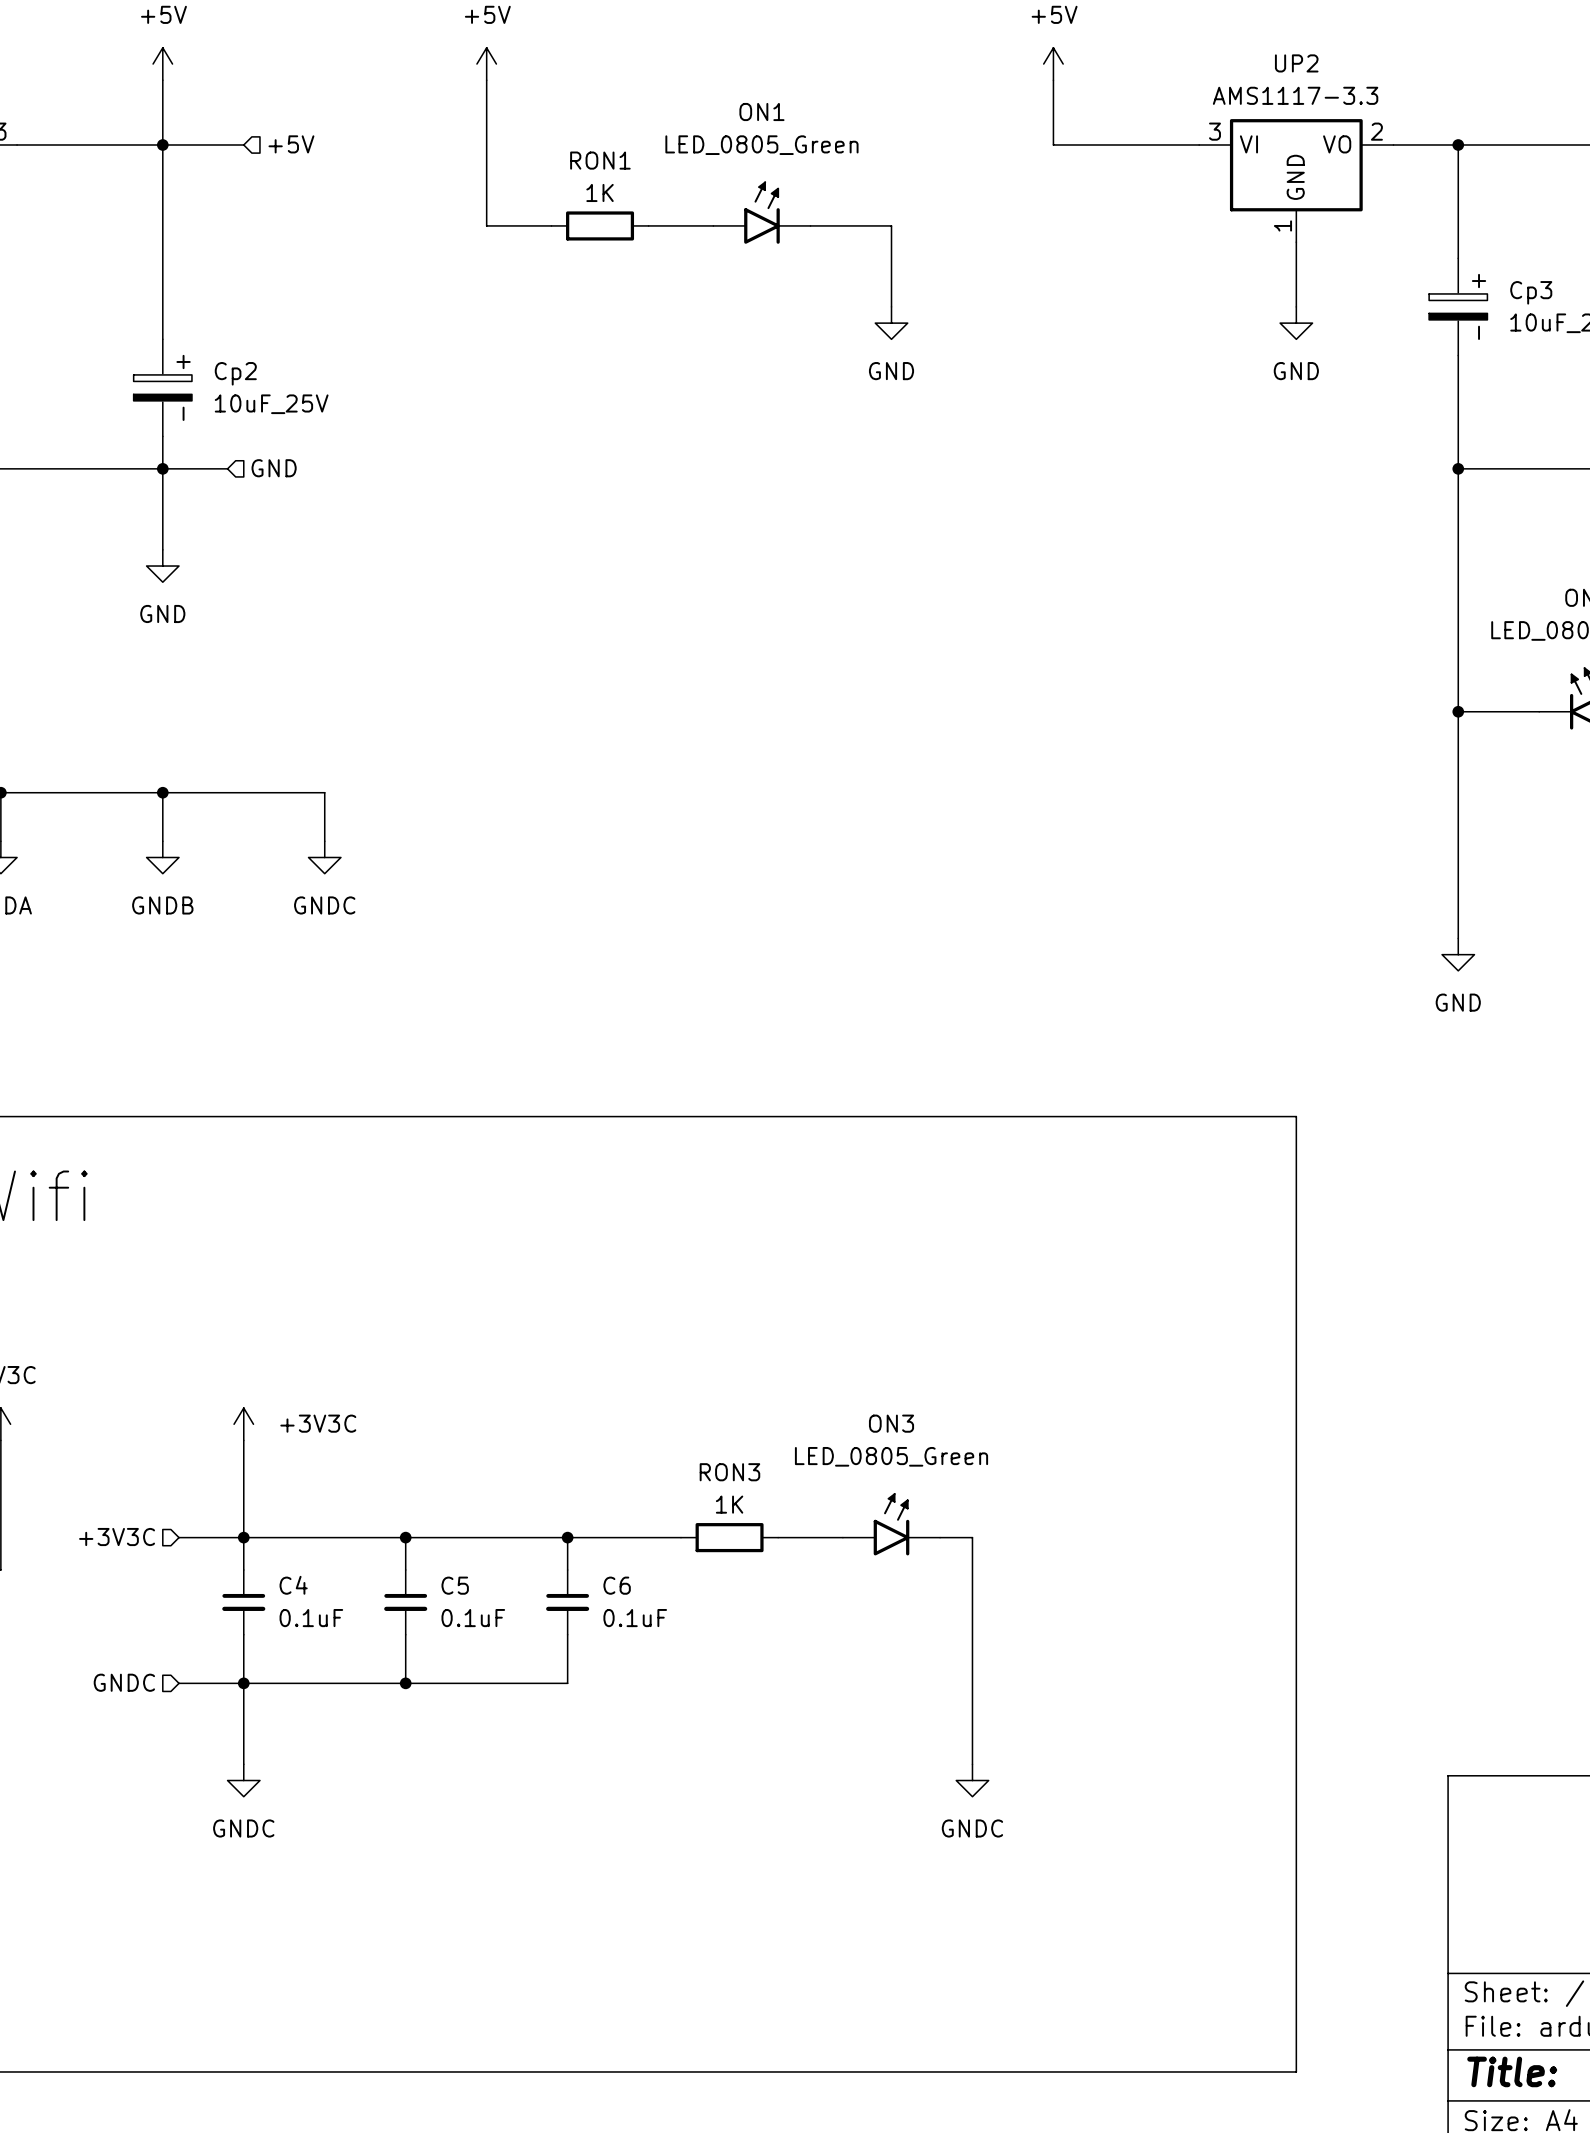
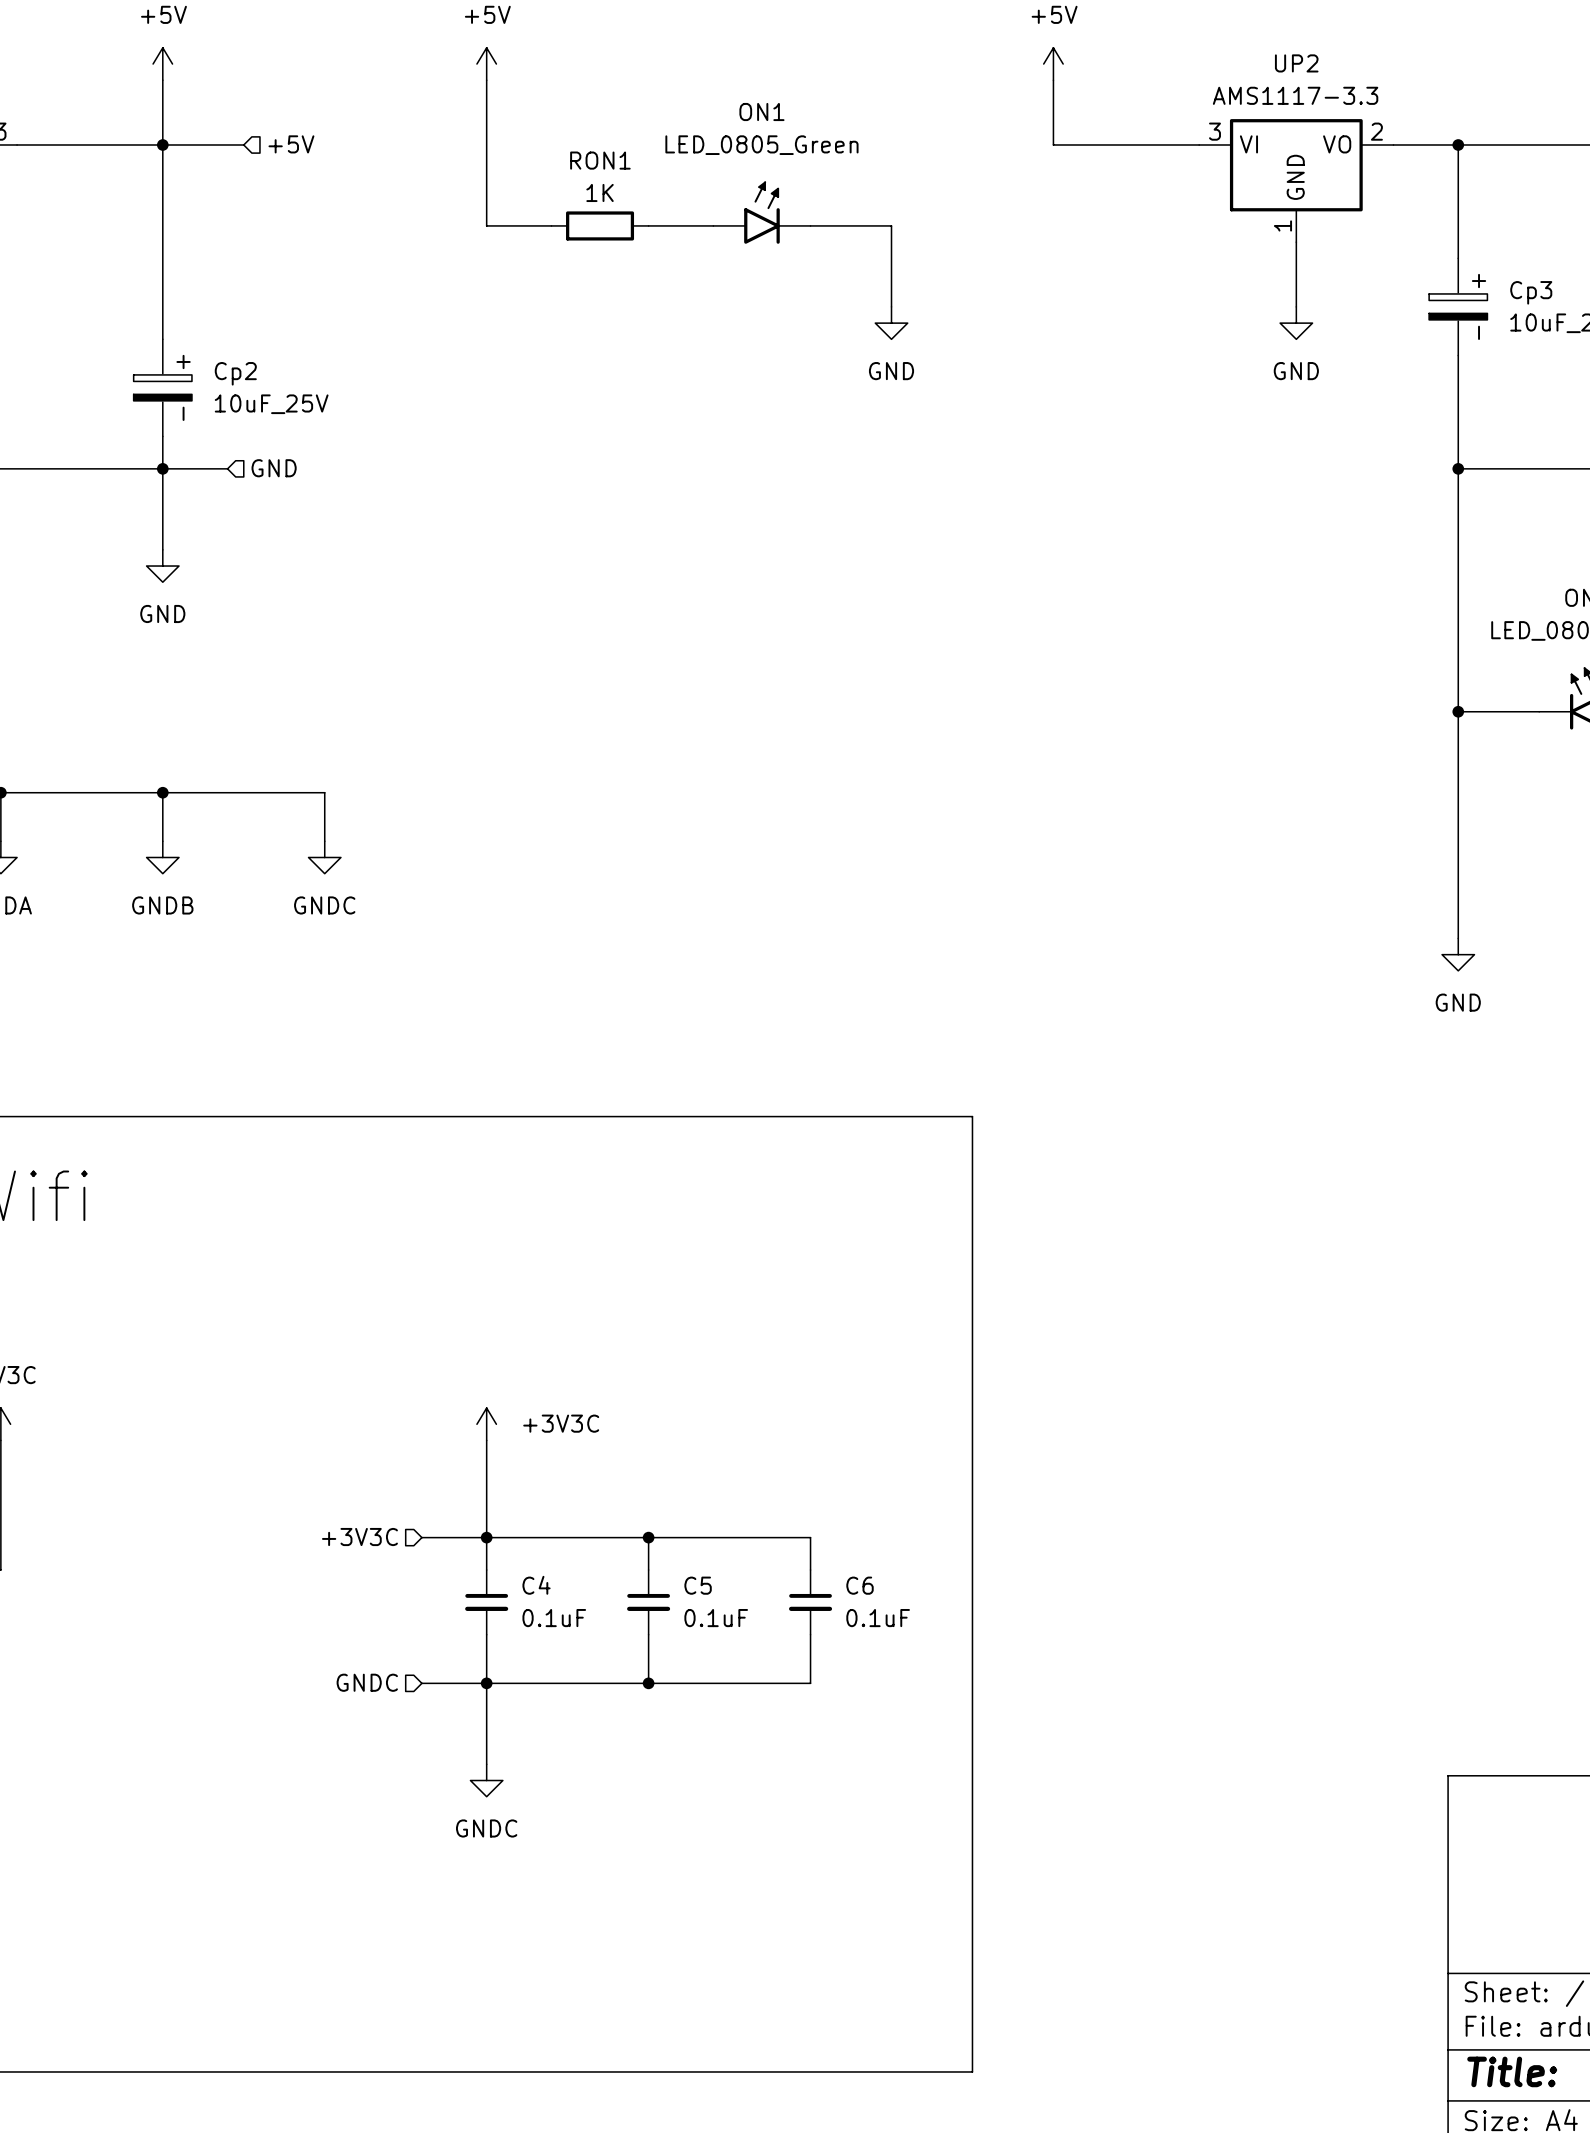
wire: (972, 1116) (1296, 1116) (1296, 2071) (972, 2071) -> (972, 1764) (972, 2071)
power symbol position: +3V3C (243, 1424) -> +3V3C (486, 1424)
wire: (243, 1440) (243, 1570) -> (486, 1440) (486, 1570)
ON3: LED_0805_Green (891, 1524) -> none
hierarchical label position: +3V3C (117, 1537) -> +3V3C (359, 1537)
wire: (179, 1537) (421, 1537) -> none
junction: (243, 1537) -> none
wire: (405, 1537) (405, 1570) -> (648, 1537) (648, 1570)
junction: (405, 1537) -> none
junction: none -> (486, 1537)
wire: (567, 1537) (567, 1570) -> none
junction: (567, 1537) -> none
junction: none -> (648, 1537)
wire: none -> (680, 1537) (778, 1537)
RON3: (729, 1537) -> none
wire: (810, 1537) (842, 1537) -> (810, 1537) (810, 1570)
wire: (940, 1537) (972, 1537) -> (972, 1116) (972, 1537)
C4 position: (243, 1602) -> (486, 1602)
C5 position: (405, 1602) -> (648, 1602)
C6 position: (567, 1602) -> (810, 1602)
wire: (243, 1634) (243, 1764) -> (486, 1634) (486, 1764)
wire: (405, 1634) (405, 1683) -> (648, 1634) (648, 1683)
wire: (567, 1634) (567, 1683) -> (810, 1634) (810, 1683) (567, 1683)
hierarchical label position: GNDC (124, 1682) -> GNDC (367, 1682)
wire: (179, 1683) (421, 1683) -> none
junction: (243, 1683) -> none
junction: (405, 1683) -> none
junction: none -> (486, 1683)
junction: none -> (648, 1683)
power symbol: GNDC (243, 1780) -> none
power symbol: none -> GNDC (486, 1780)
power symbol: GNDC (972, 1780) -> none

